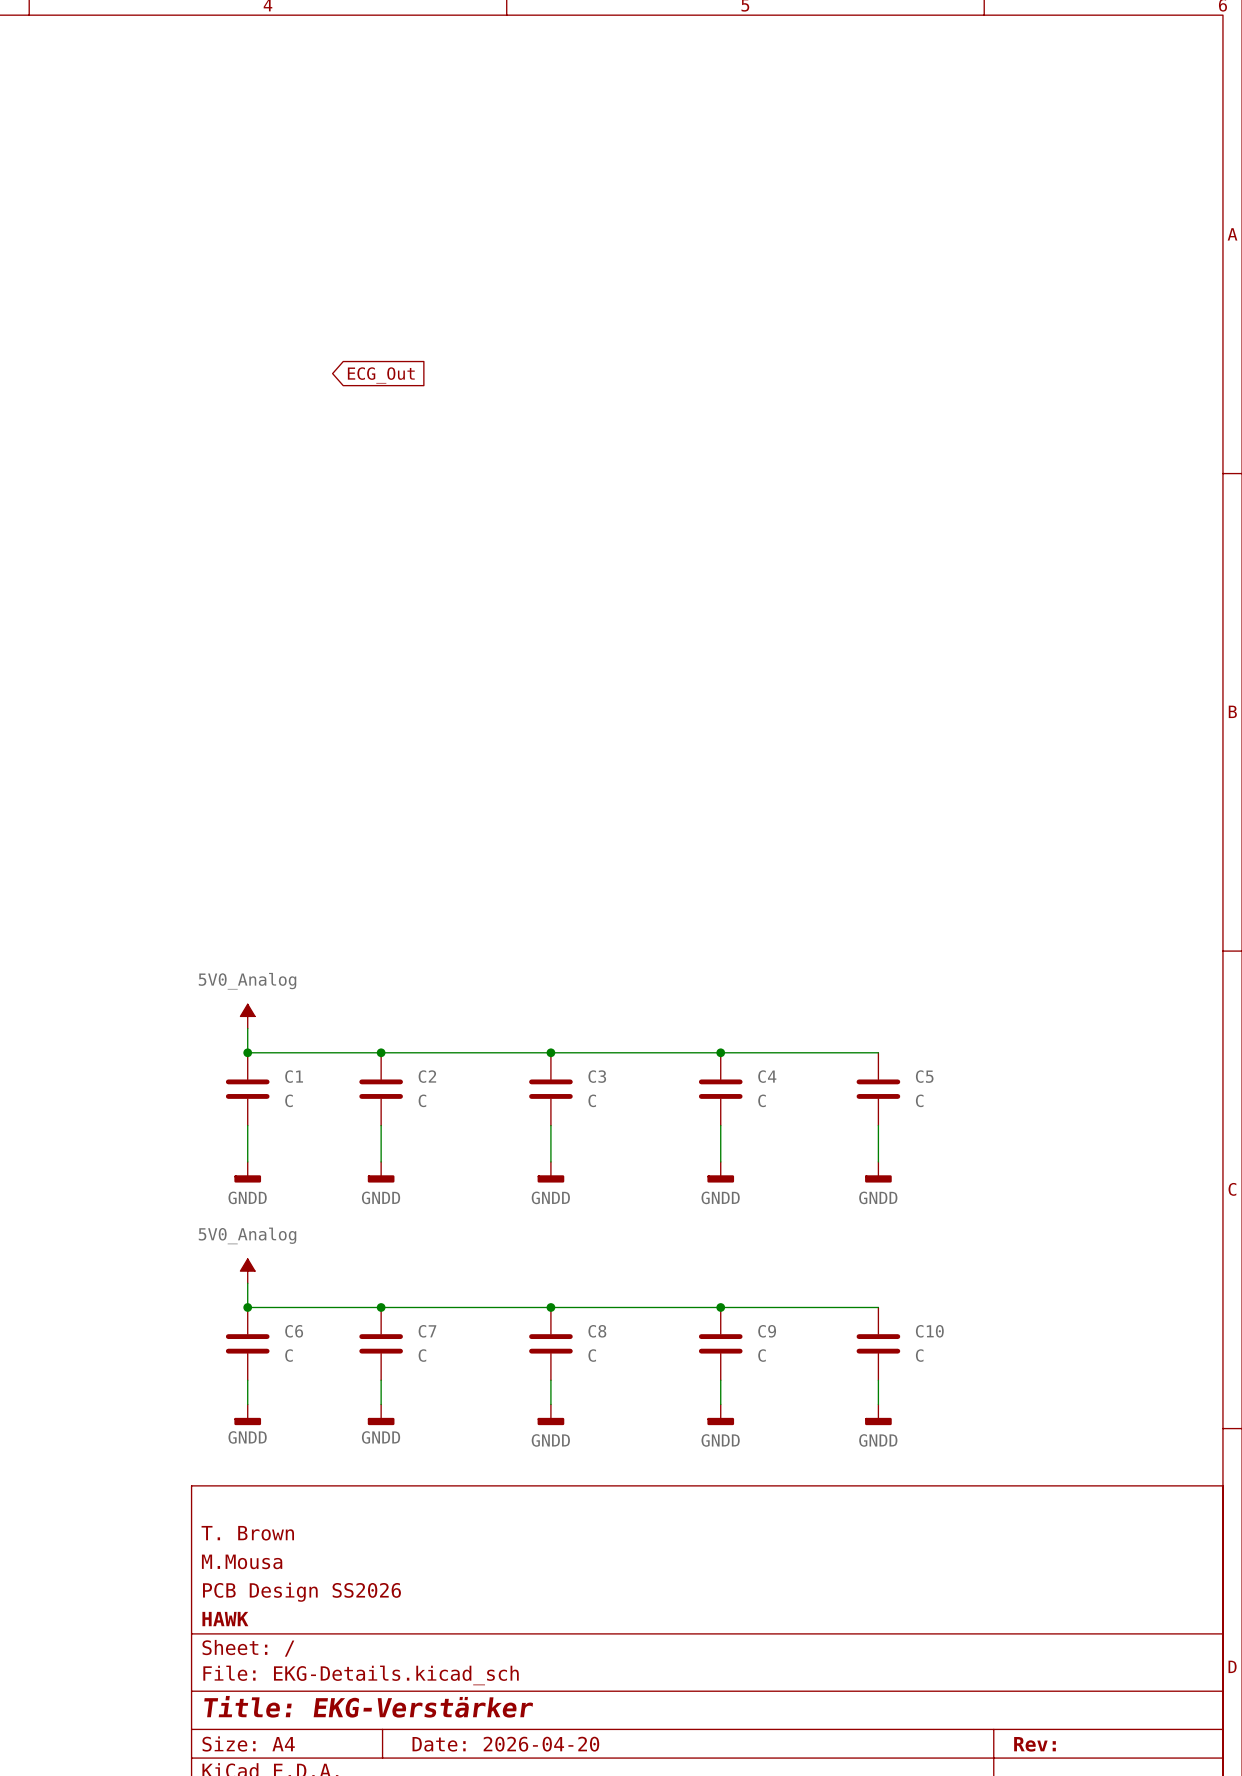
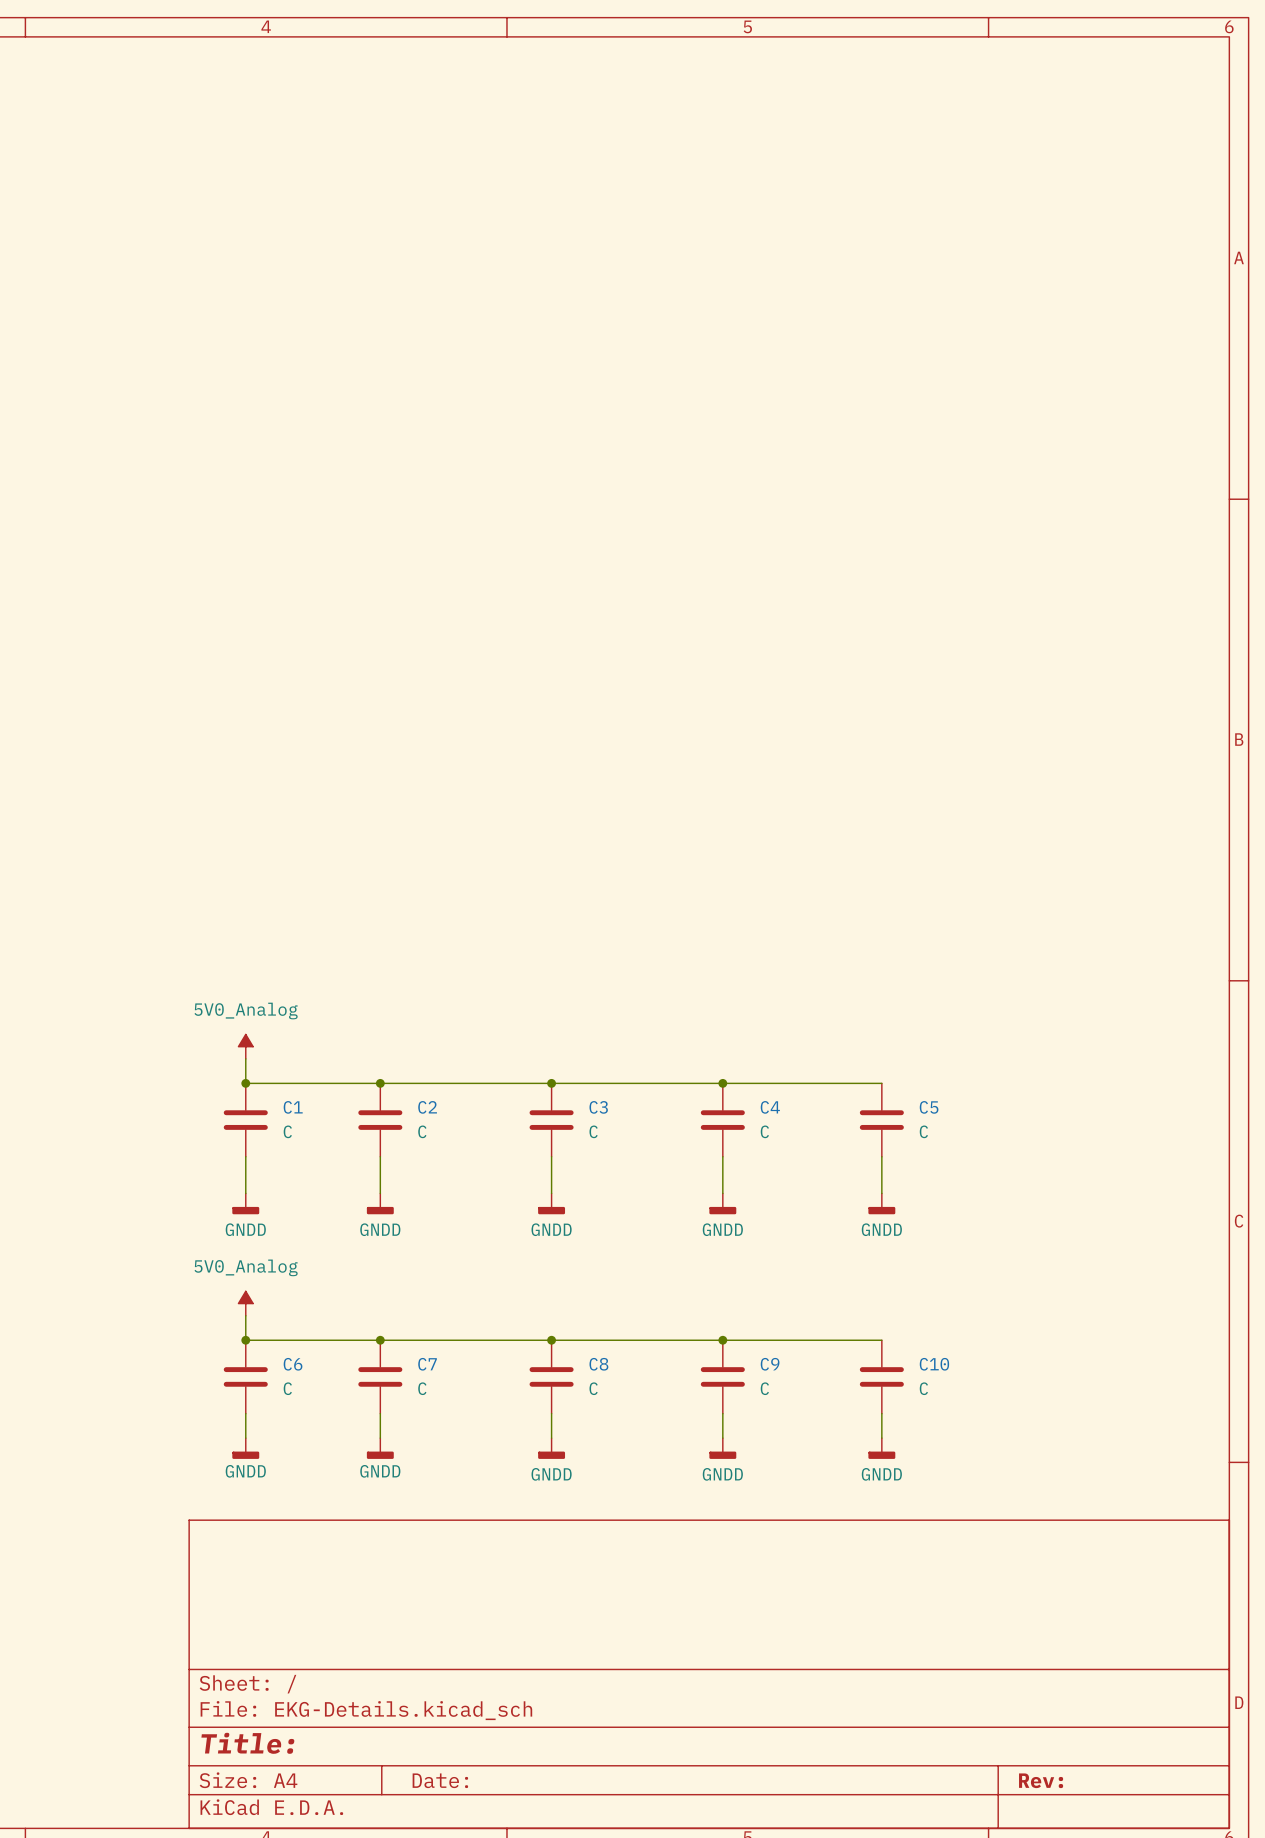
global label: ECG_Out (381, 375) -> none
title block: T. Brown (247, 1533) -> none
title block: M.Mousa (242, 1561) -> none
title block: PCB Design SS2026 (301, 1592) -> none
title block: HAWK (225, 1619) -> none
title block: Title: EKG-Verstärker (368, 1706) -> Title: (247, 1743)
title block: Date: 2026-04-20 (505, 1744) -> Date: (440, 1780)

